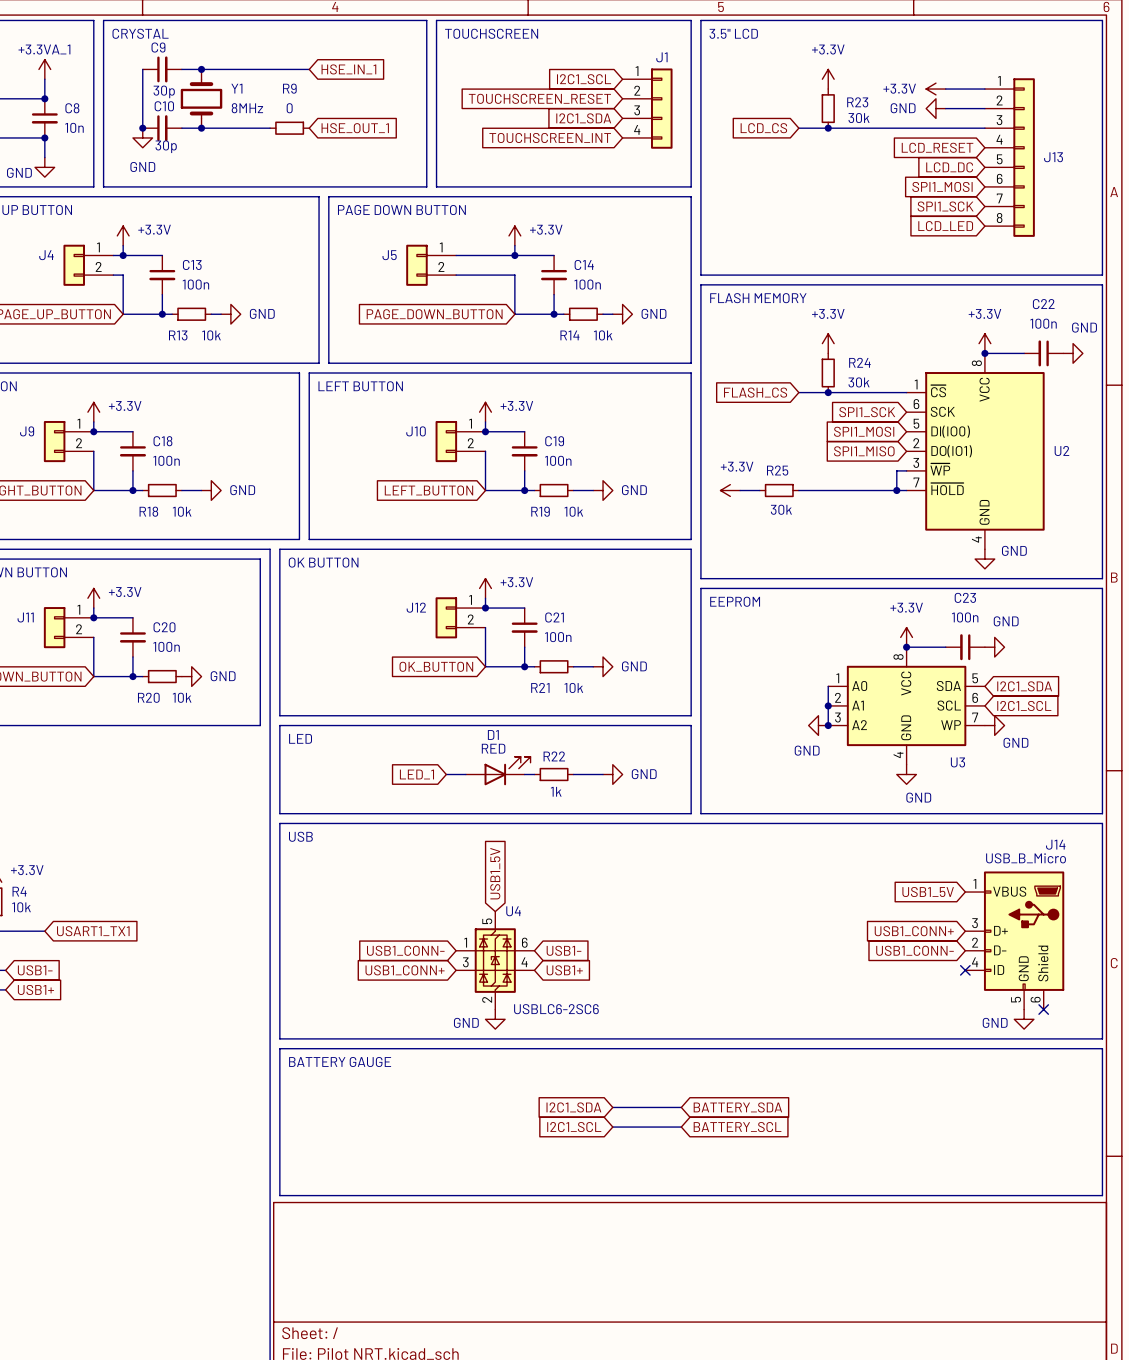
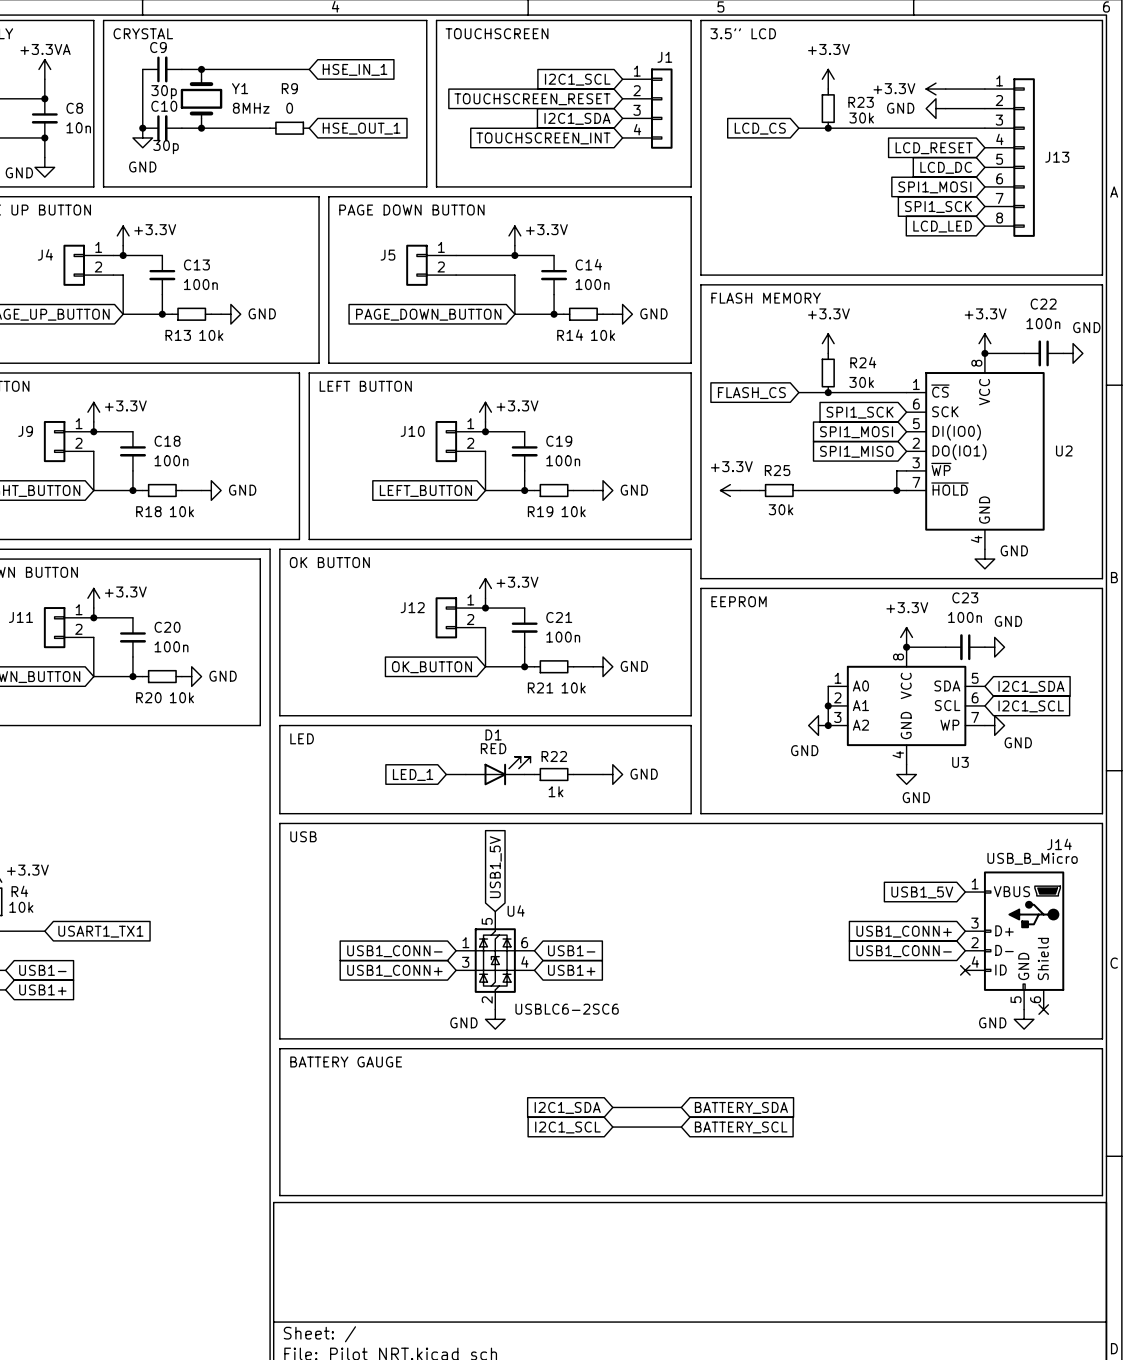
power symbol: +3.3VA_1 (44, 69) -> +3.3VA (44, 69)

